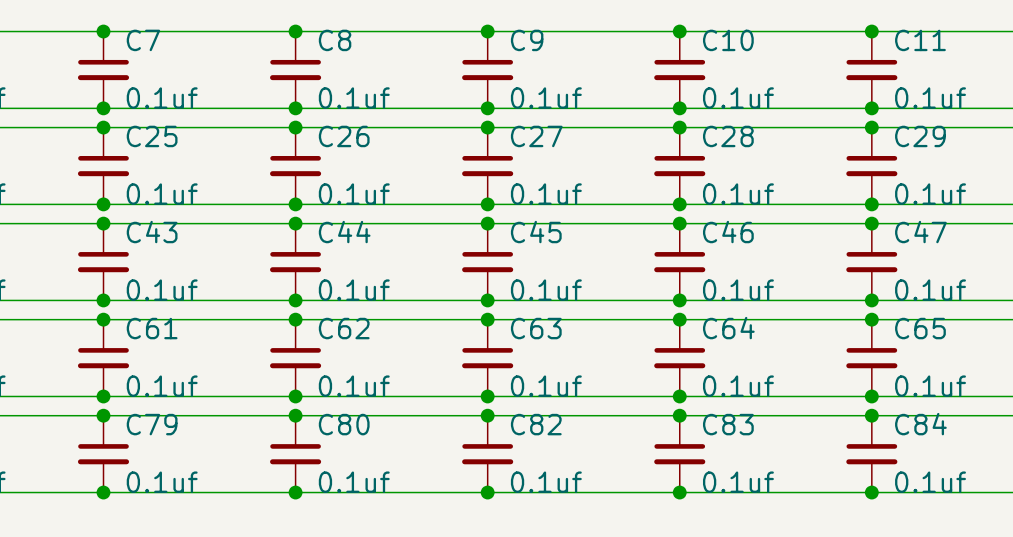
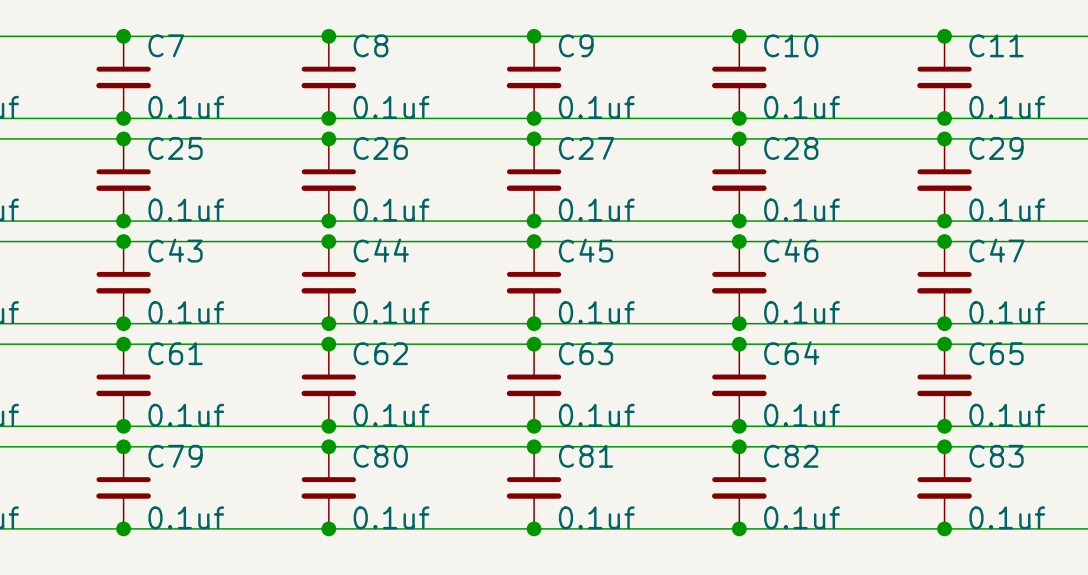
C82 name: C82 (536, 424) -> C81 (586, 456)
C83 name: C83 (728, 424) -> C82 (791, 456)
C84 name: C84 (920, 424) -> C83 (996, 456)

